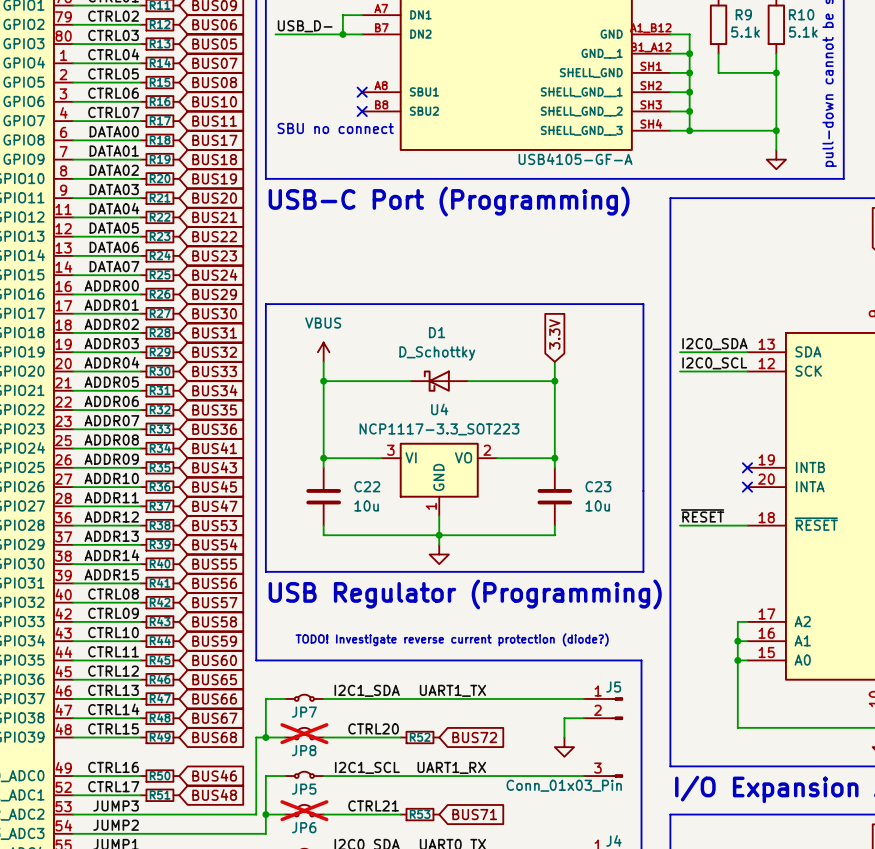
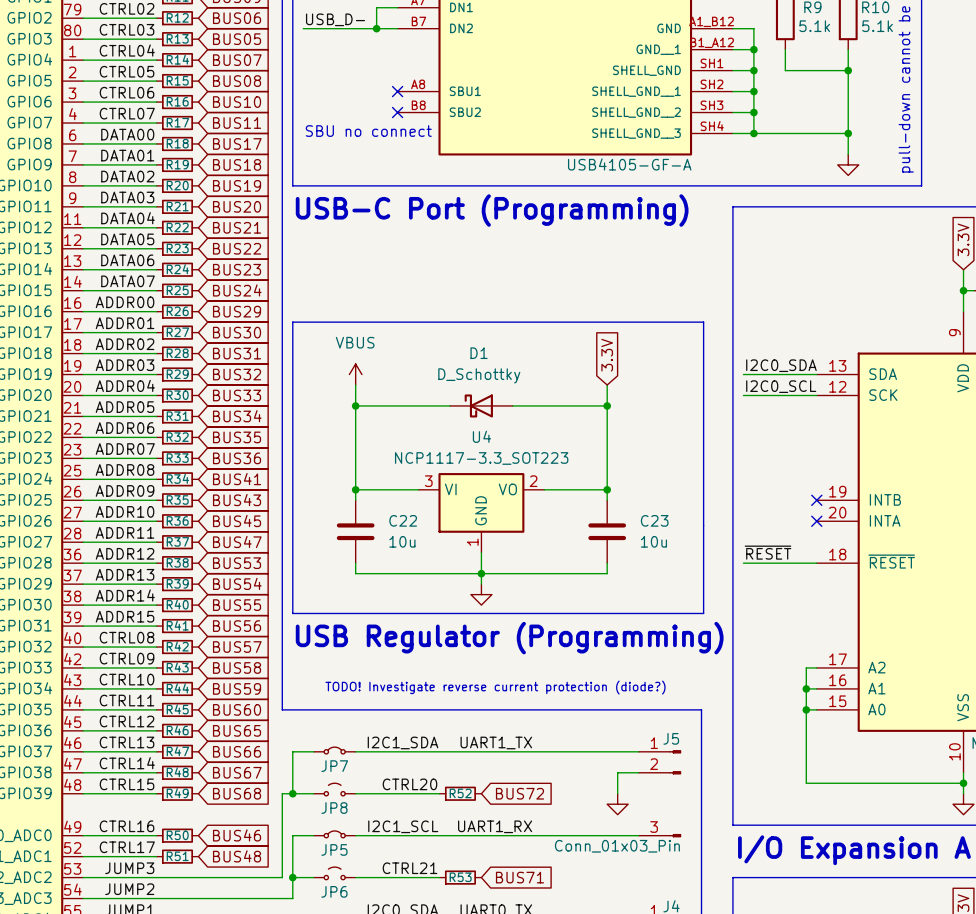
JP8 do-not-place cross: (304, 733) -> none
JP6 do-not-place cross: (304, 810) -> none

